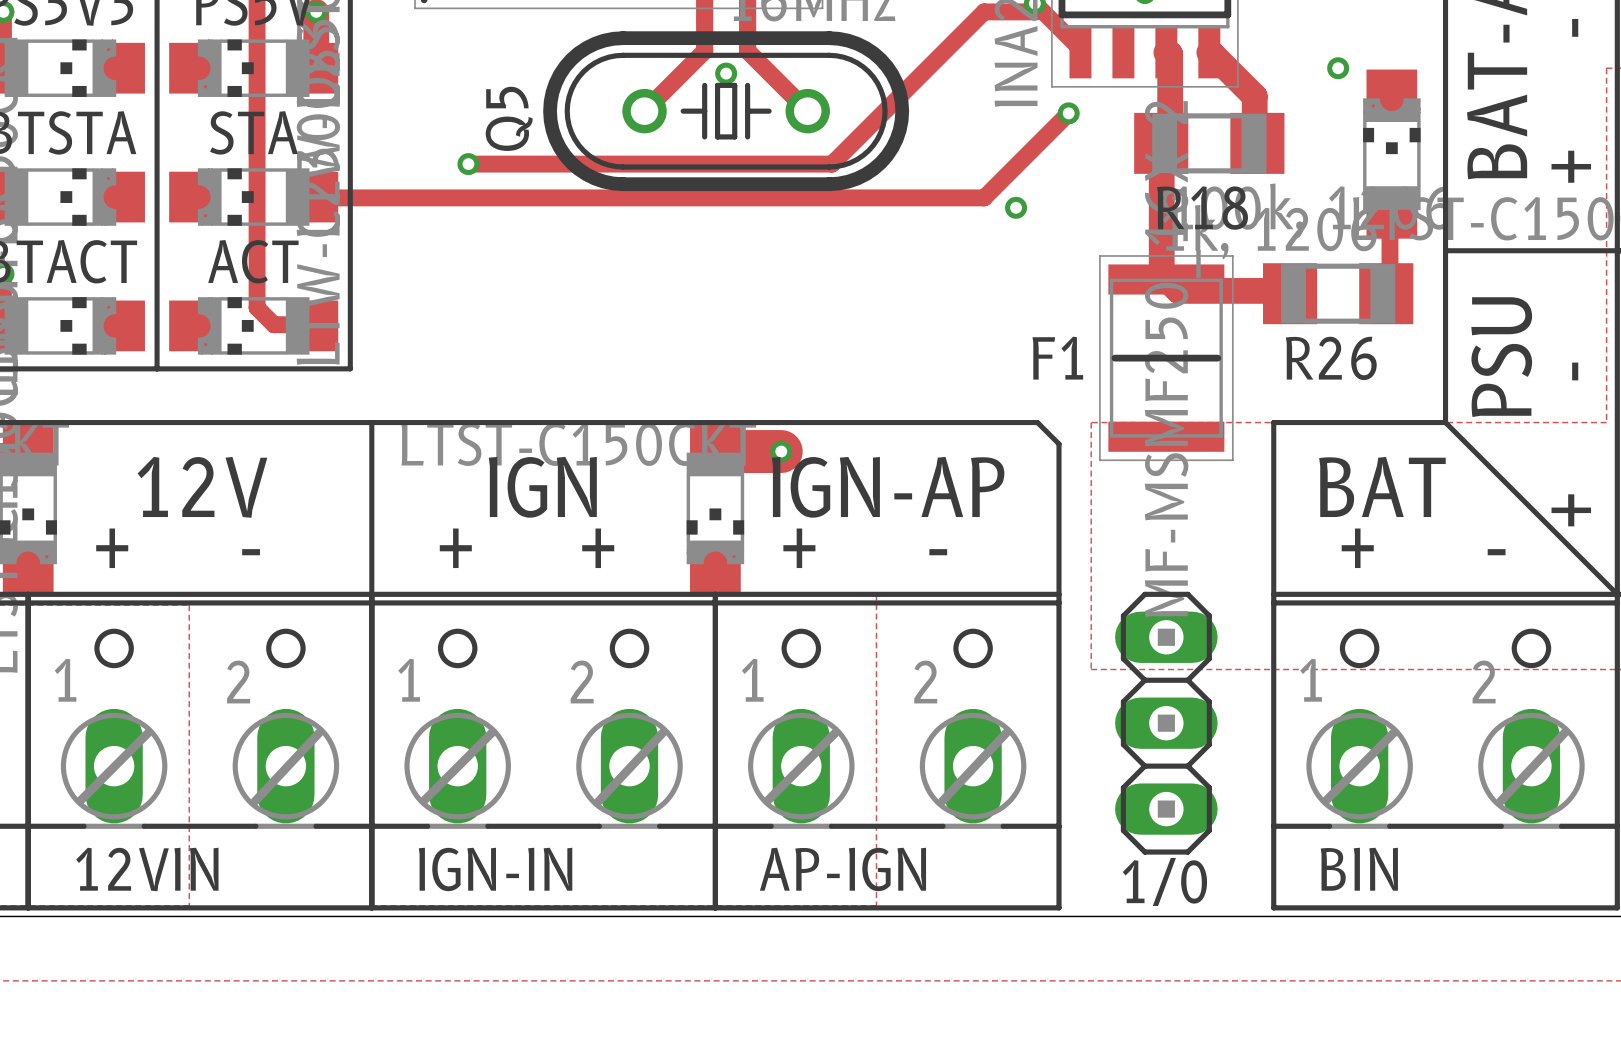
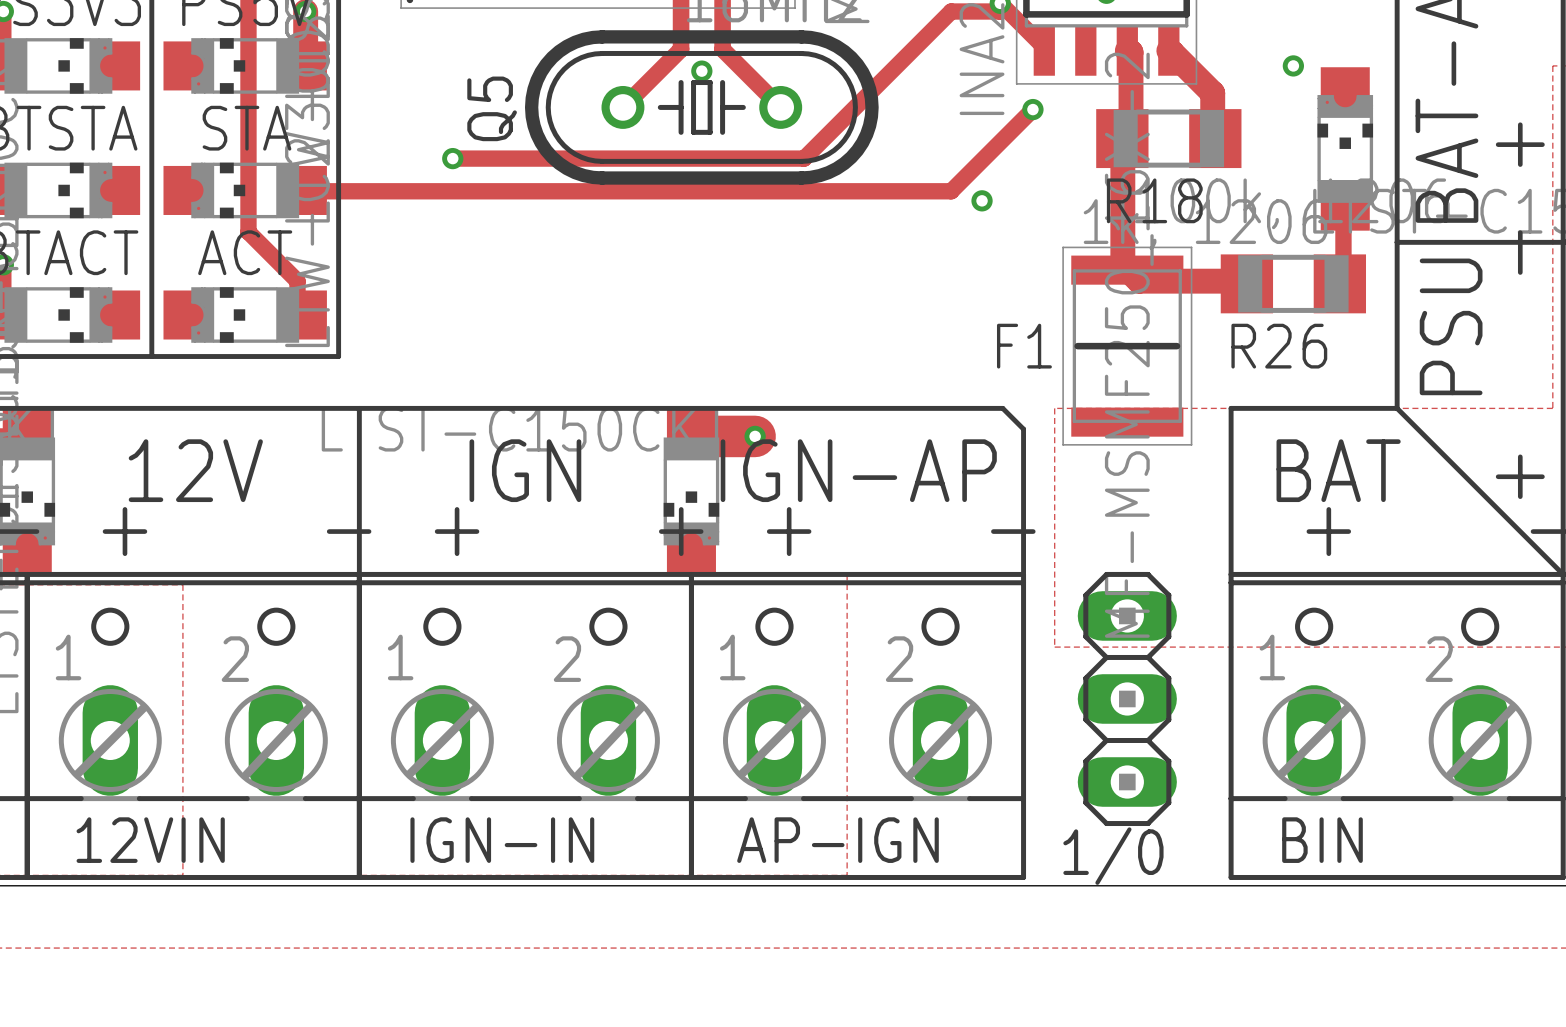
track: (257, 240) (257, 307) (273, 324) (307, 324) -> (248, 232) (297, 281) (297, 313)

